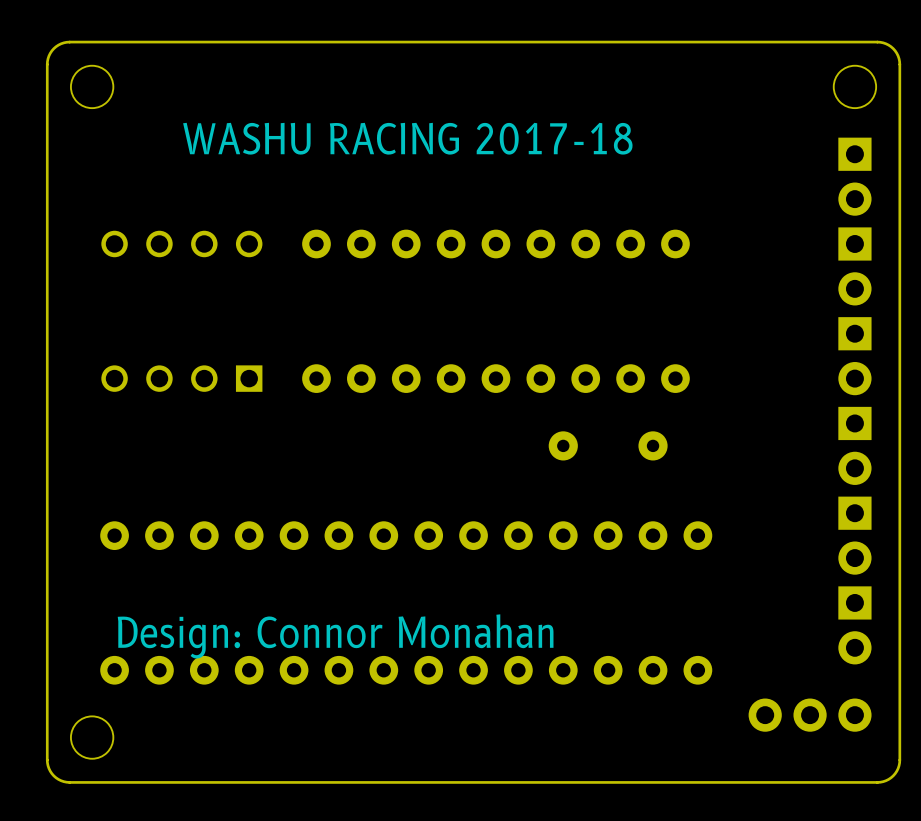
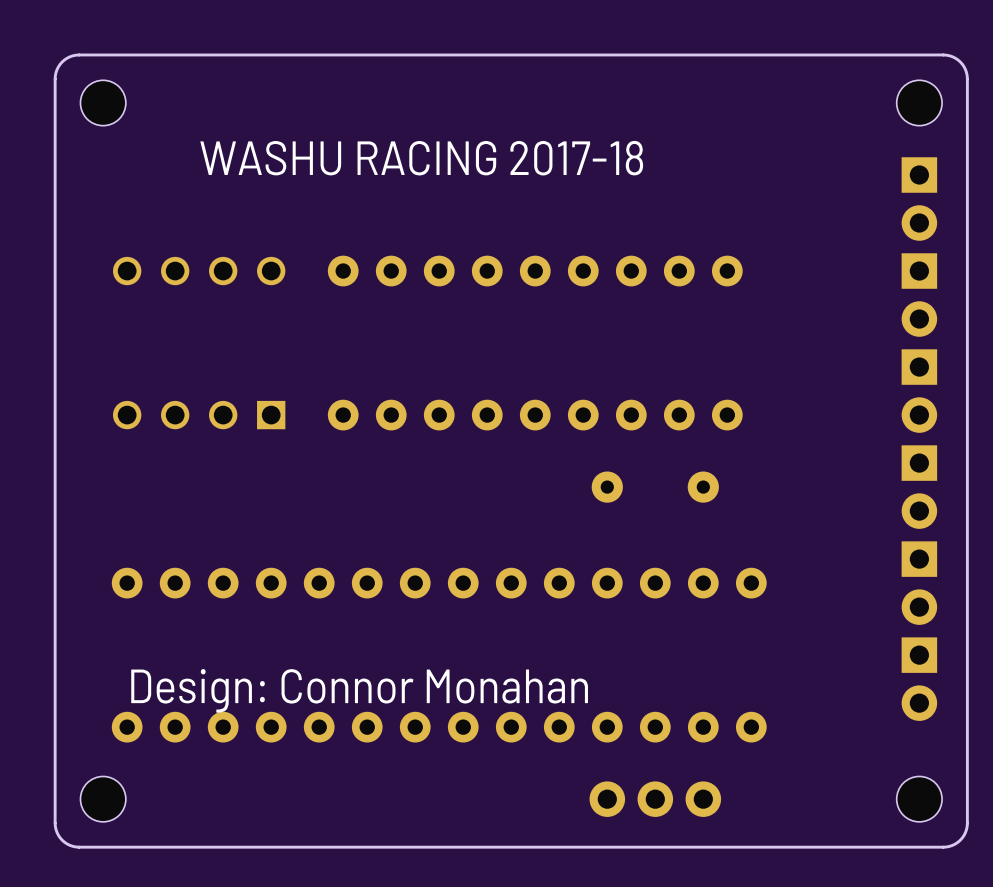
part position: (810, 715) -> (655, 799)
hole: none -> (919, 799)

